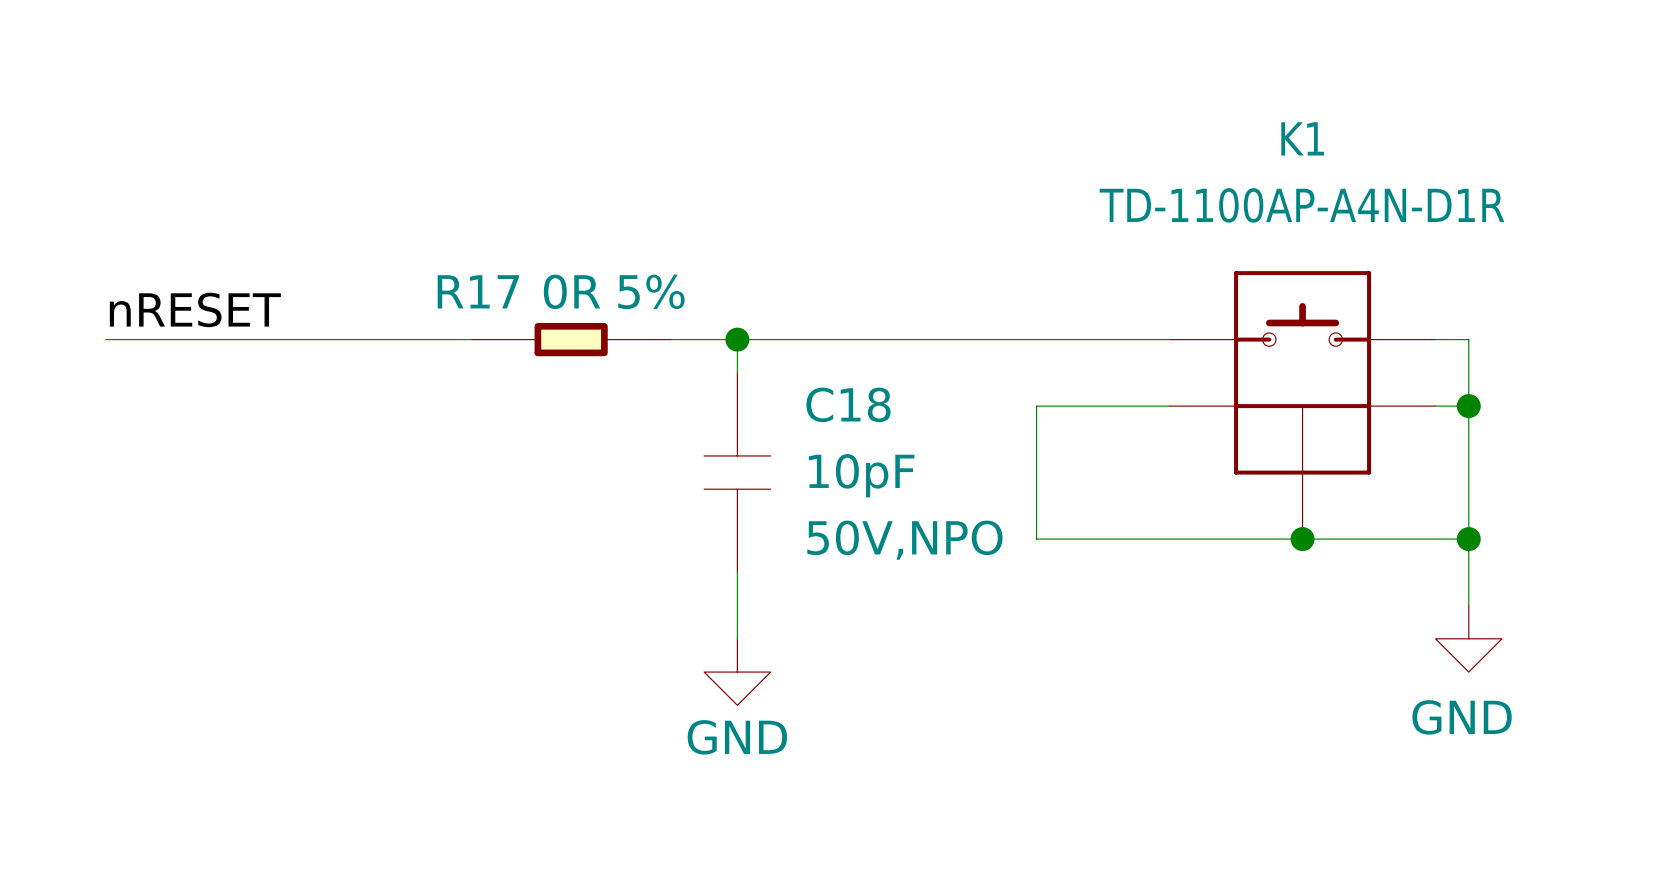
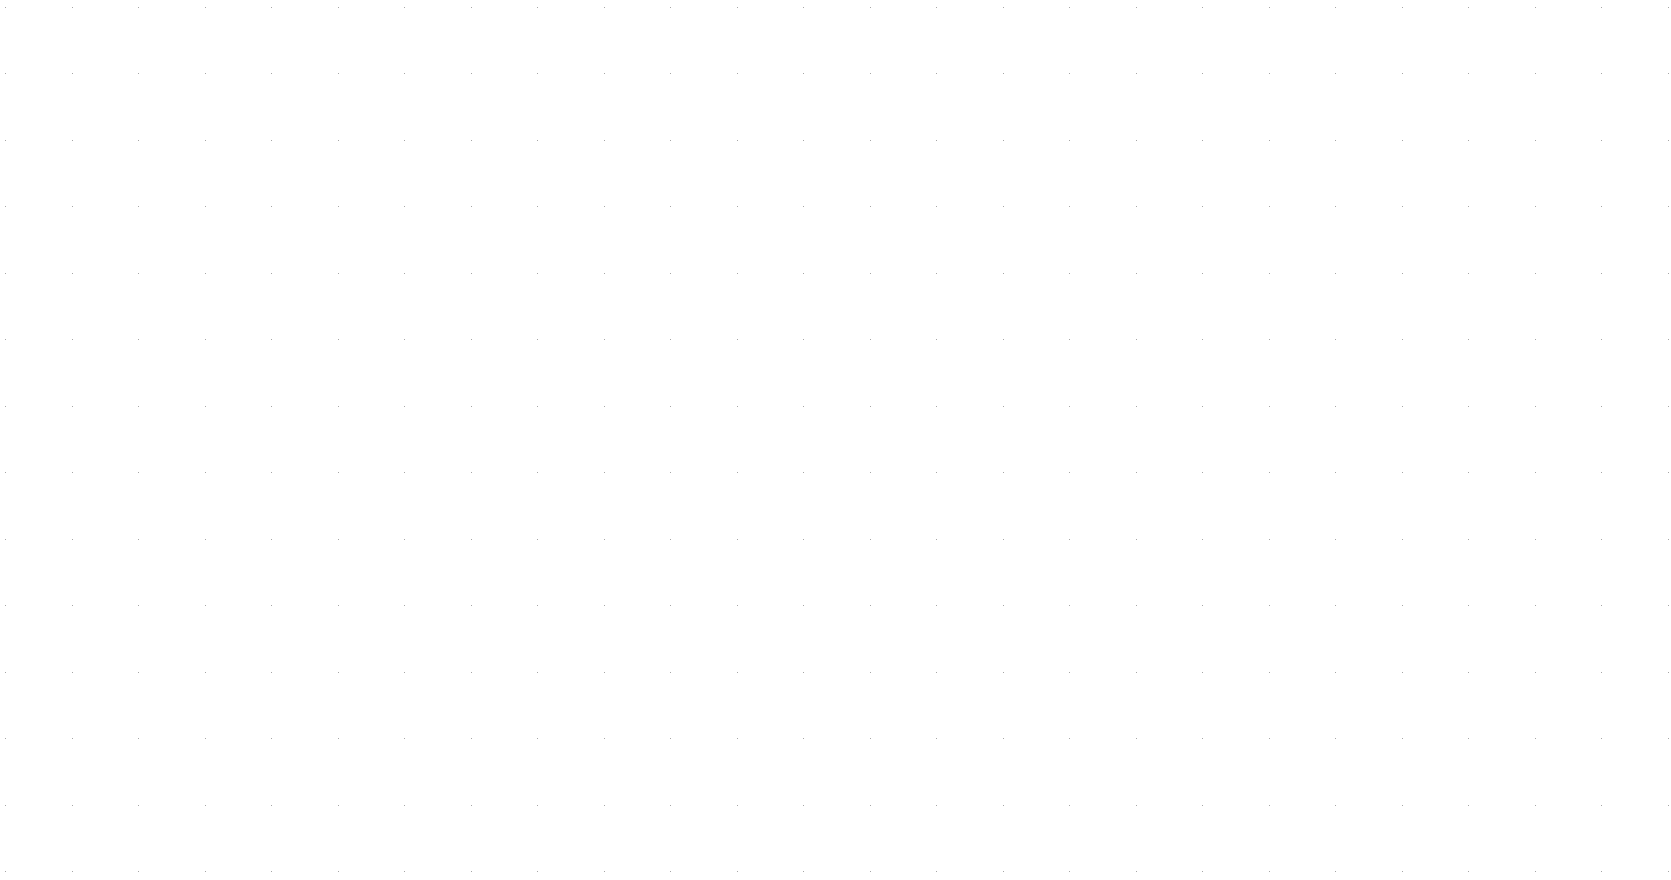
label: nRESET (195, 309) -> none
wire: (105, 339) (471, 339) -> none
R17: 0R (571, 339) -> none
wire: (670, 339) (1169, 339) -> none
wire: (737, 339) (737, 372) -> none
junction: (737, 339) -> none
wire: (1435, 339) (1468, 339) (1468, 605) -> none
K1: TD-1100AP-A4N-D1R (1302, 405) -> none
wire: (1169, 406) (1036, 406) (1036, 539) (1468, 539) -> none
wire: (1435, 406) (1468, 406) -> none
junction: (1468, 406) -> none
C18: 10pF (737, 472) -> none
junction: (1302, 539) -> none
junction: (1468, 539) -> none
wire: (737, 572) (737, 638) -> none
power symbol: GND (1468, 638) -> none
power symbol: GND (737, 672) -> none

